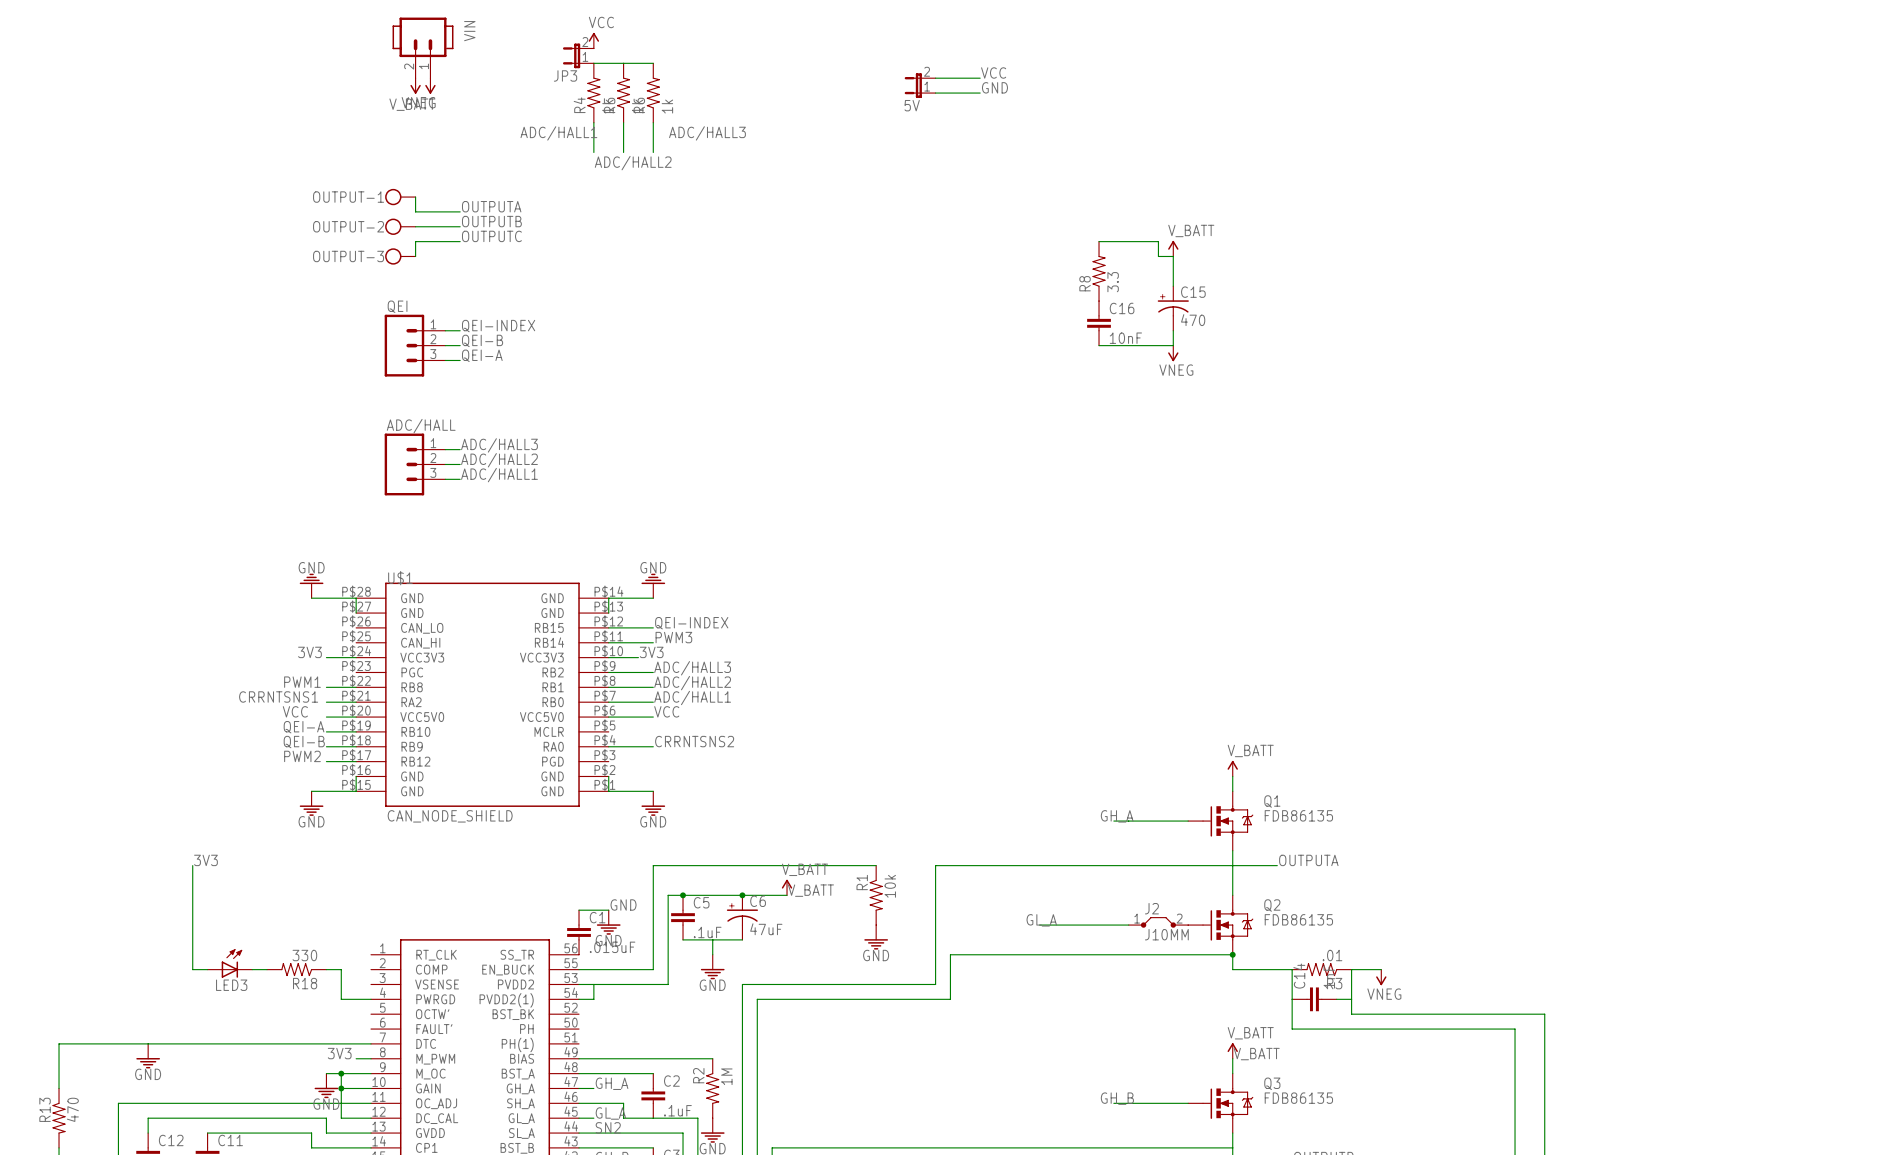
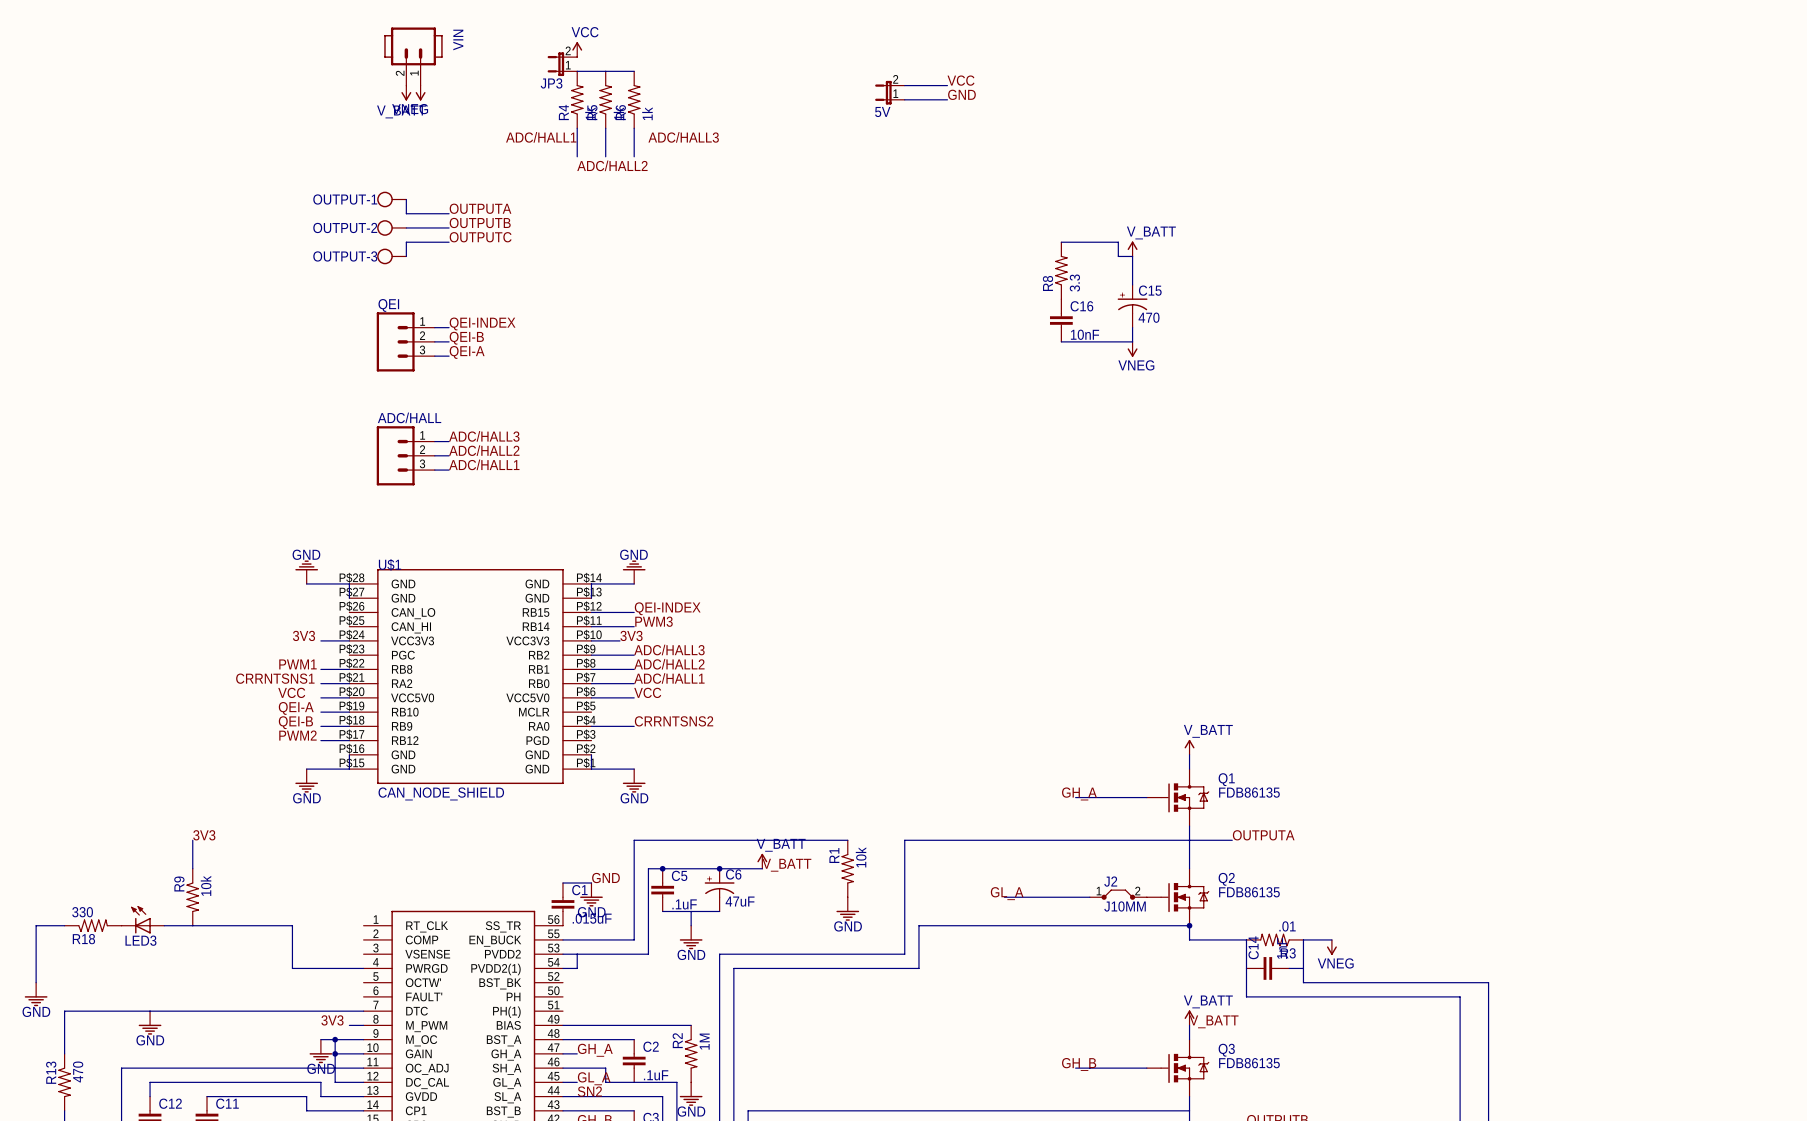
wire: (192, 895) (192, 969) (207, 969) -> none
R9: none -> 10k (192, 897)
wire: none -> (64, 925) (36, 925) (36, 982)
LED3 position: (229, 963) -> (142, 919)
LED3 flip: as is (231, 963) -> left-right (140, 919)
wire: (252, 969) (267, 969) -> none
R18 flip: as is (296, 969) -> left-right (93, 925)
R18 position: (296, 969) -> (93, 925)
wire: (326, 969) (341, 969) (341, 999) -> (164, 925) (292, 925) (292, 968) (335, 968)
power symbol: none -> GND (36, 994)

